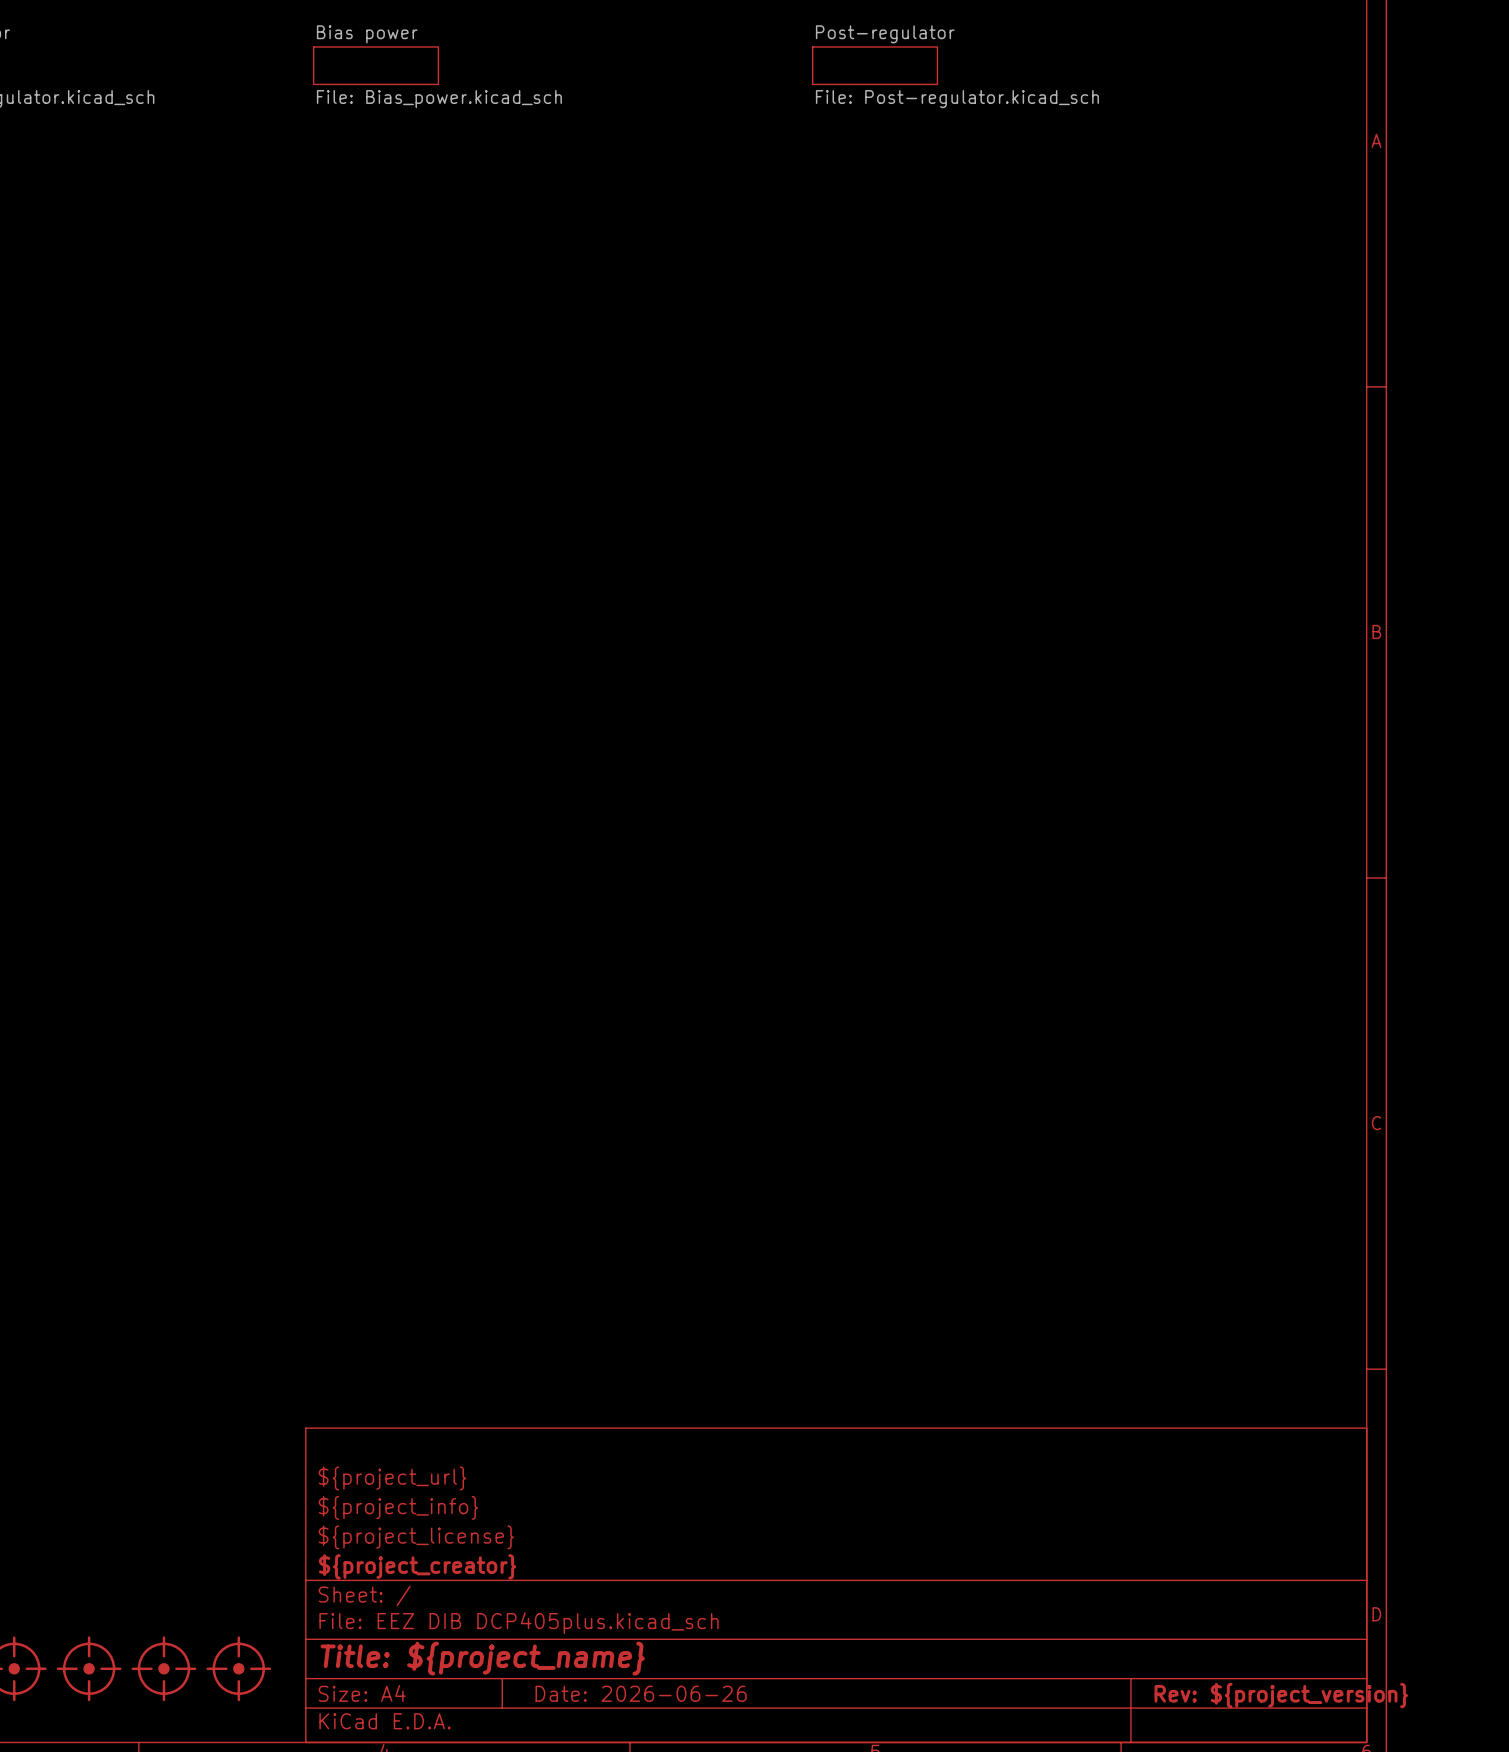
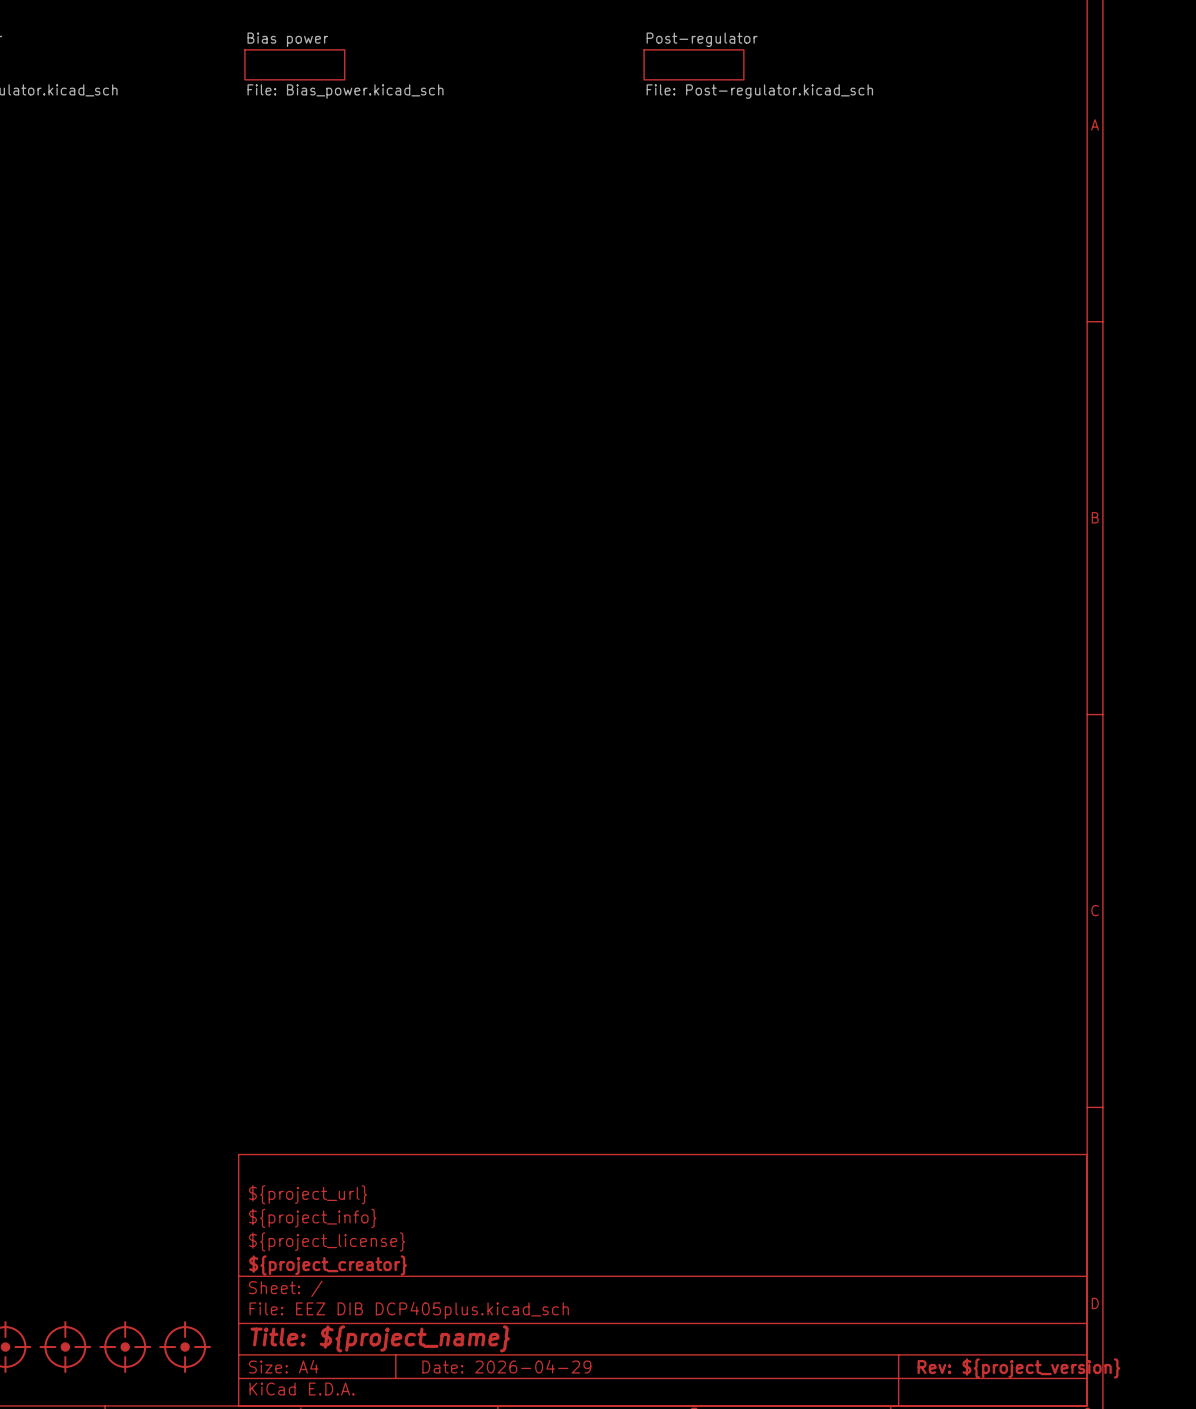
title block: Date: 2026-06-26 (641, 1693) -> Date: 2026-04-29 (506, 1366)

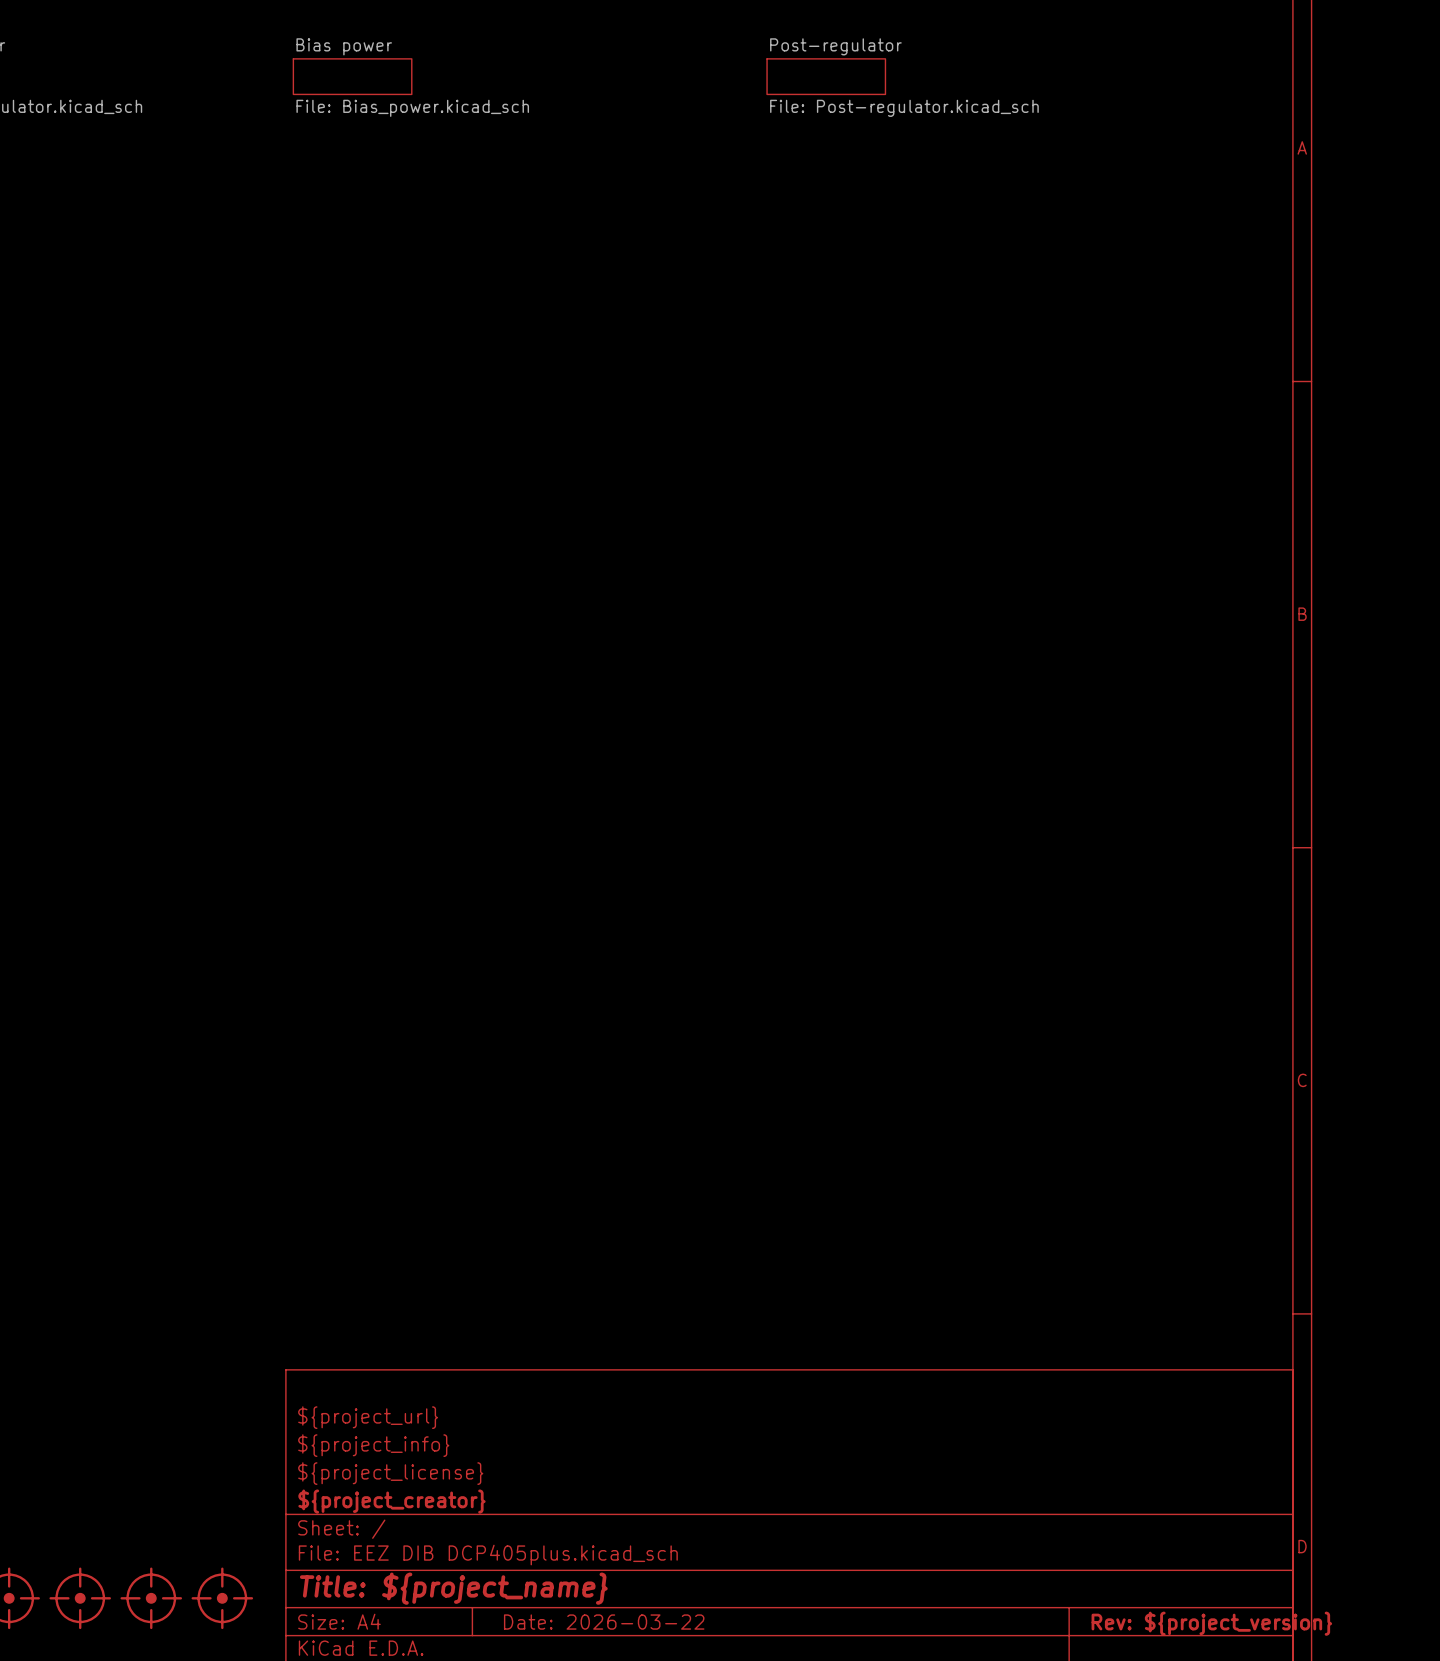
title block: Date: 2026-04-29 (506, 1366) -> Date: 2026-03-22 (604, 1622)

